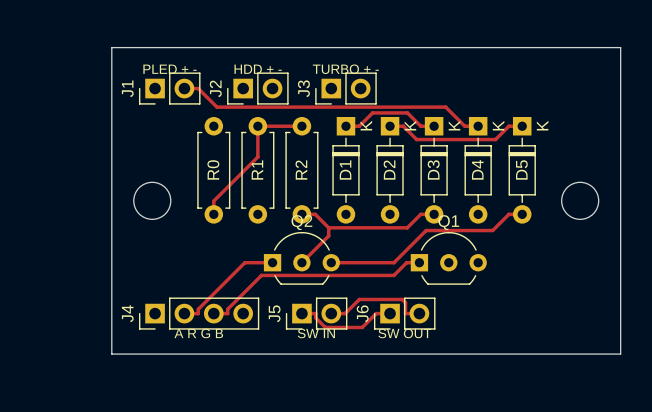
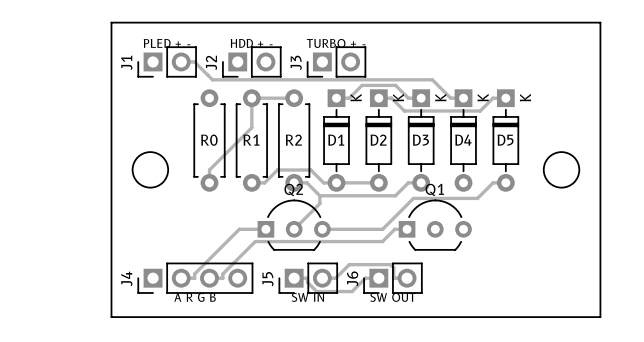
R0 name rotation: 0° (213, 169) -> 90° clockwise (209, 140)
D3 name rotation: 0° (433, 169) -> 90° clockwise (420, 140)
D4 name rotation: 0° (477, 169) -> 90° clockwise (463, 140)
D5 name rotation: 0° (521, 169) -> 90° clockwise (505, 140)
R1 name rotation: 0° (257, 170) -> 90° clockwise (251, 140)
R2 name rotation: 0° (301, 170) -> 90° clockwise (293, 140)
D1 name rotation: 0° (345, 170) -> 90° clockwise (336, 140)
D2 name rotation: 0° (389, 170) -> 90° clockwise (378, 140)
track: none -> (251, 182) (264, 182) (277, 170) (310, 170) (323, 182) (378, 182)

